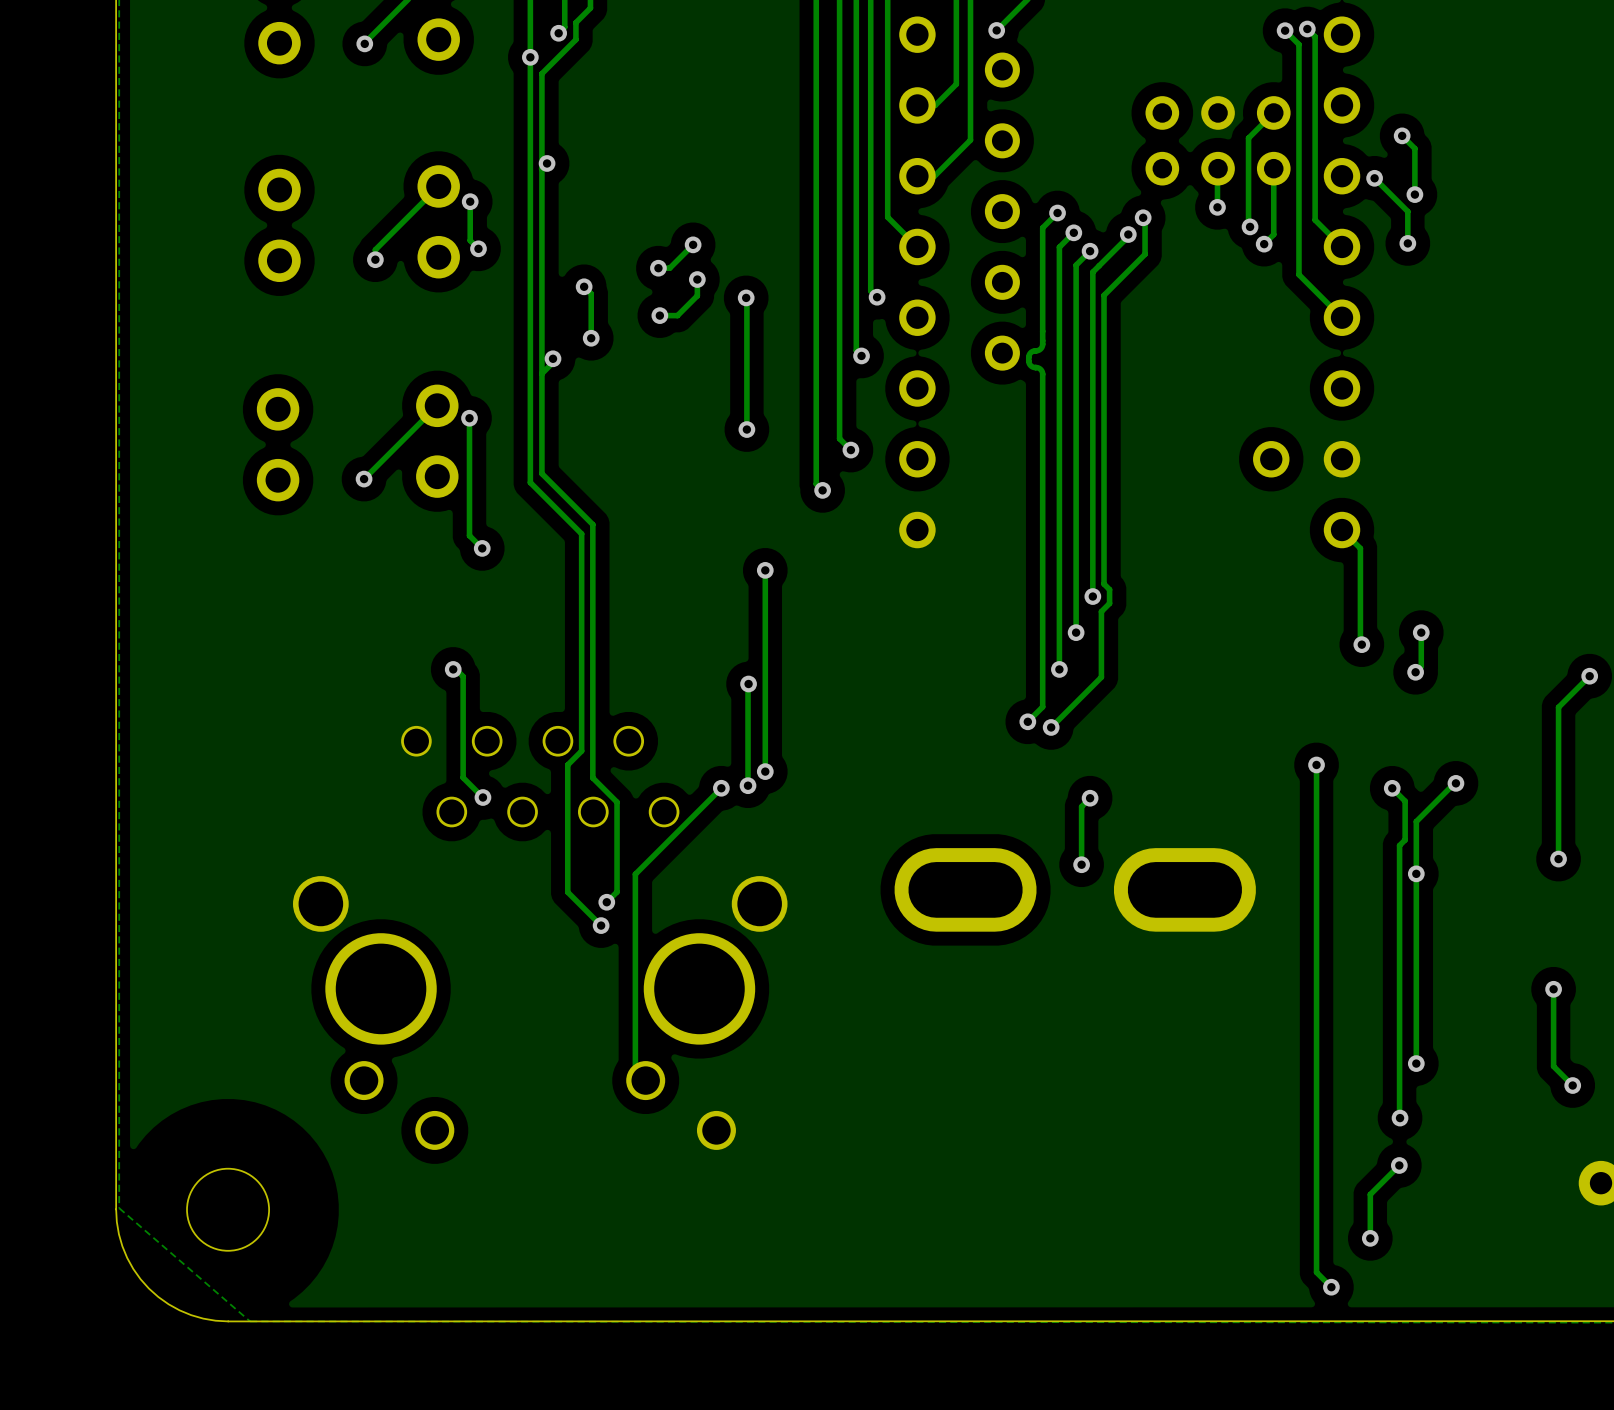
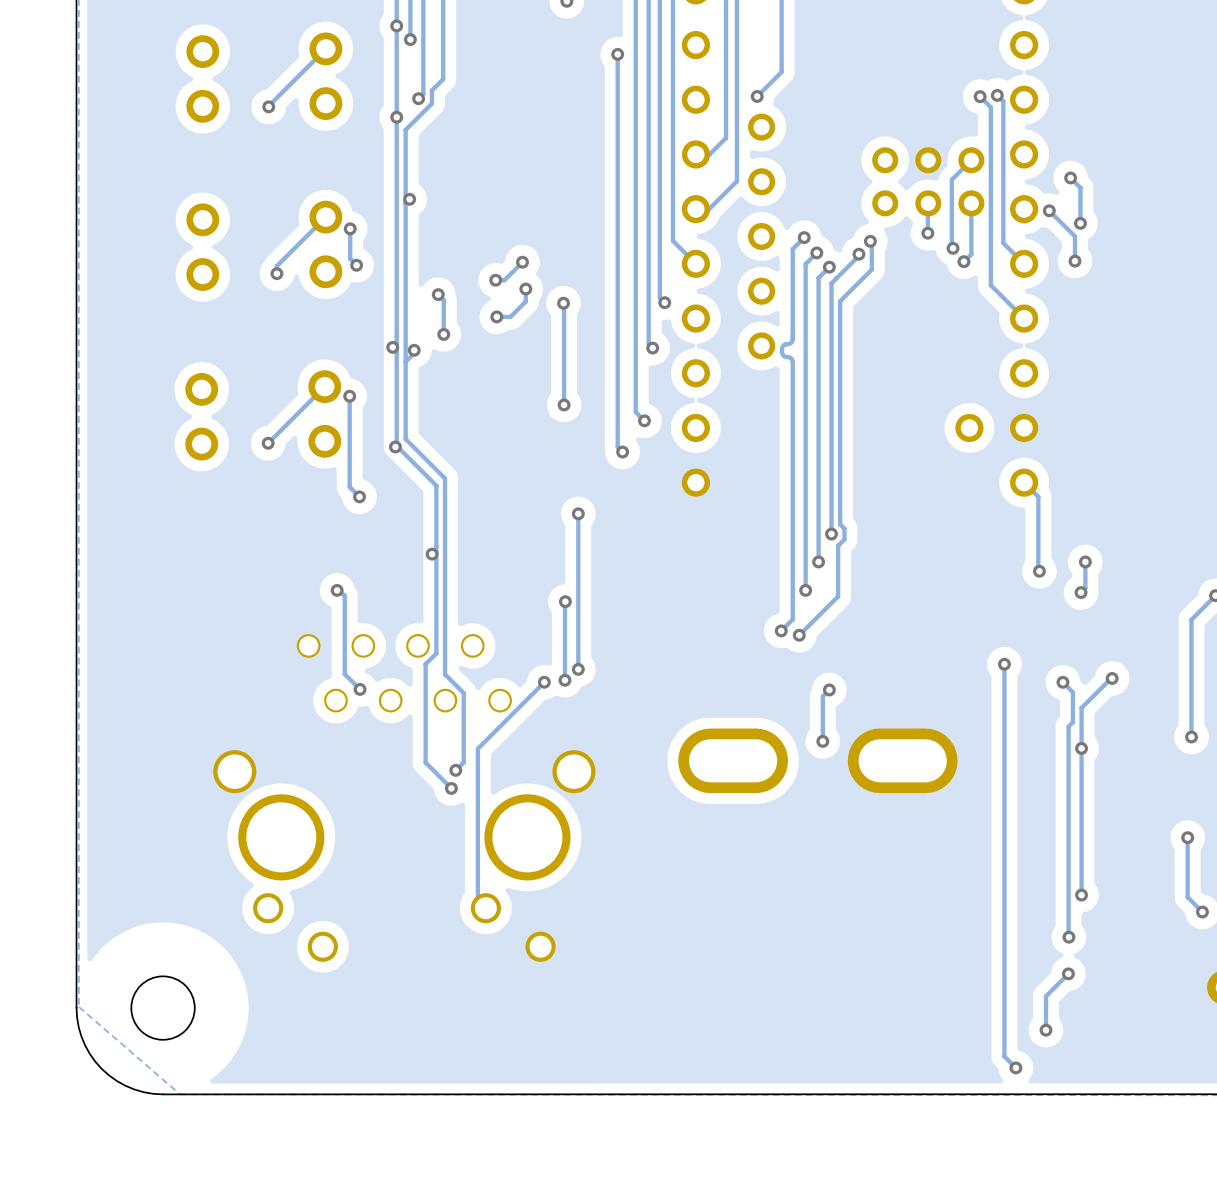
via: none -> (392, 347)
via: none -> (395, 446)
via: none -> (432, 554)

